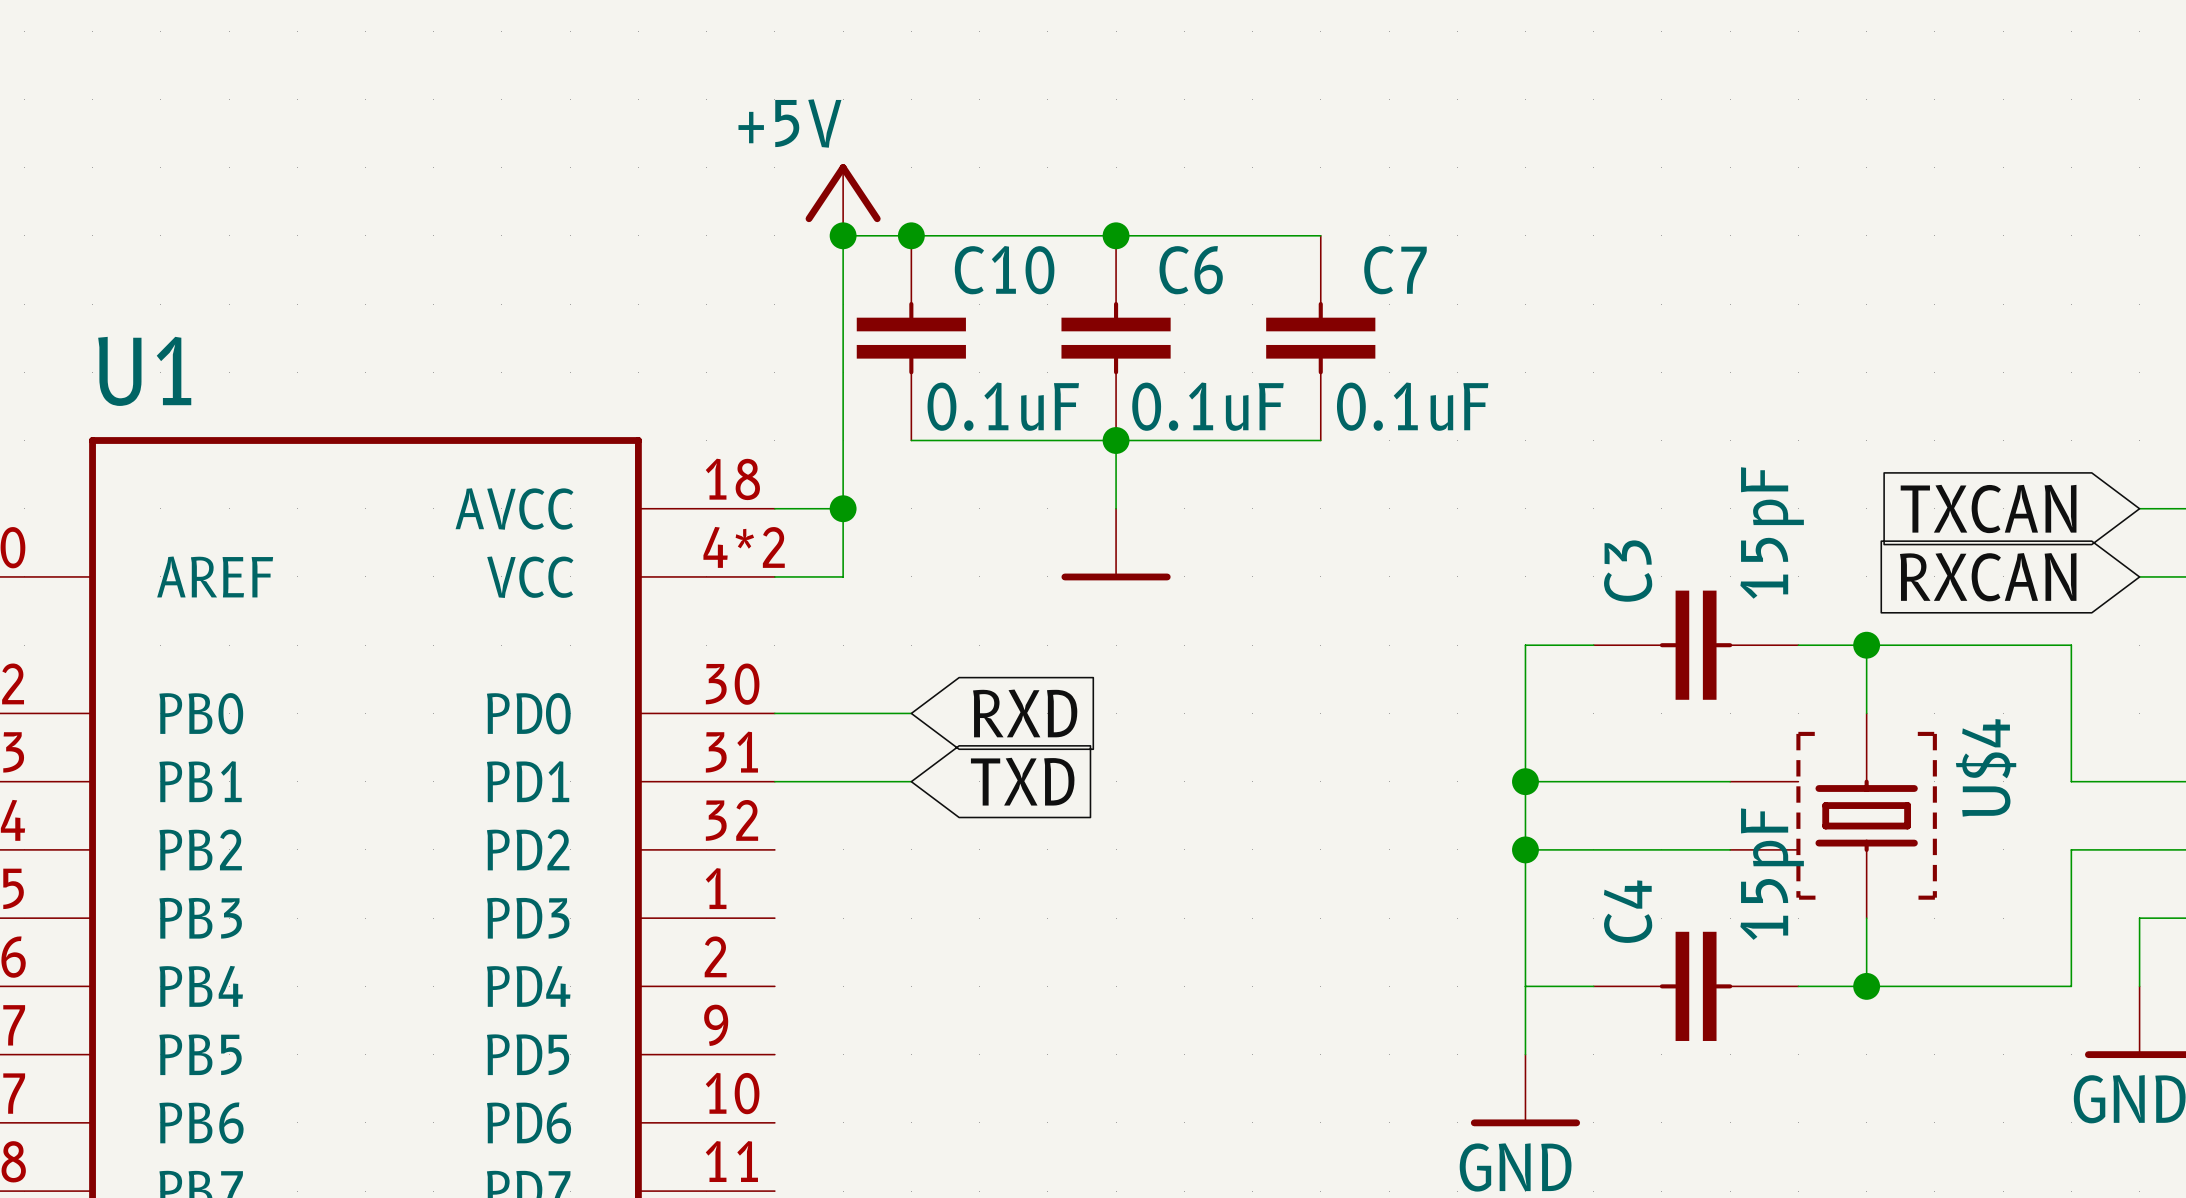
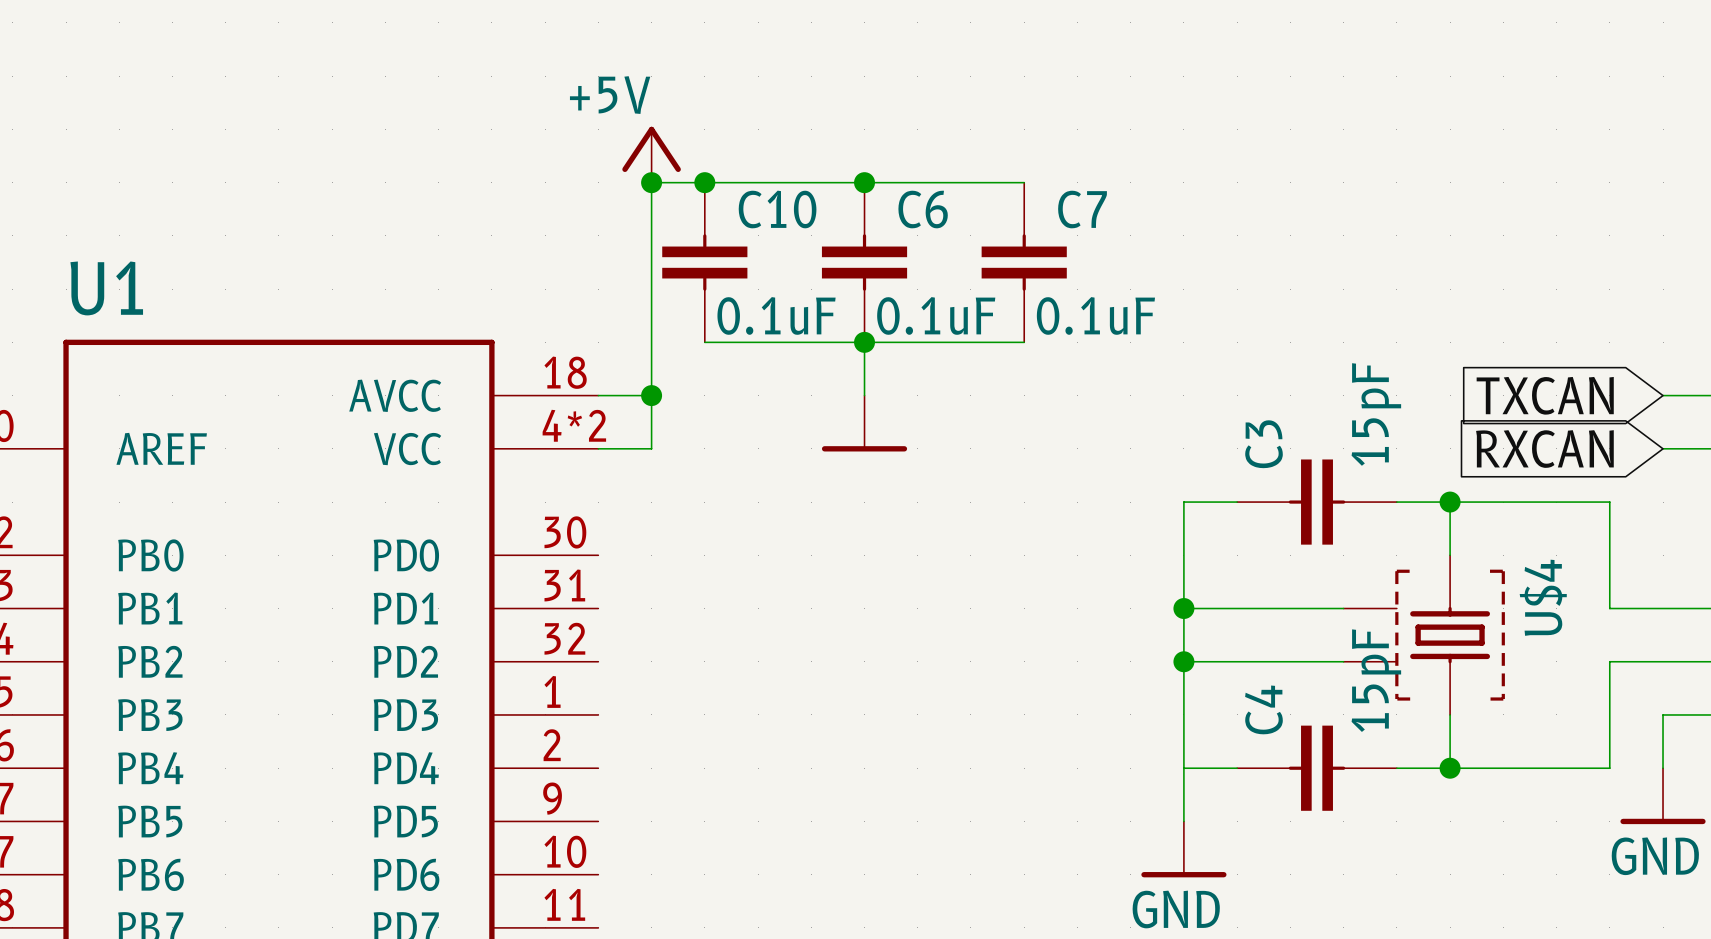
wire: (774, 713) (911, 713) -> none
global label: RXD (1025, 713) -> none
wire: (774, 781) (911, 781) -> none
global label: TXD (1022, 781) -> none

